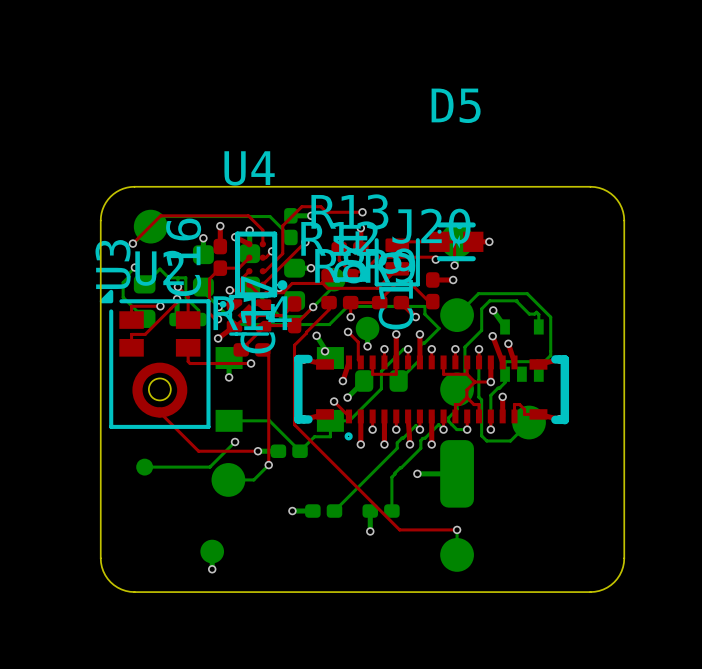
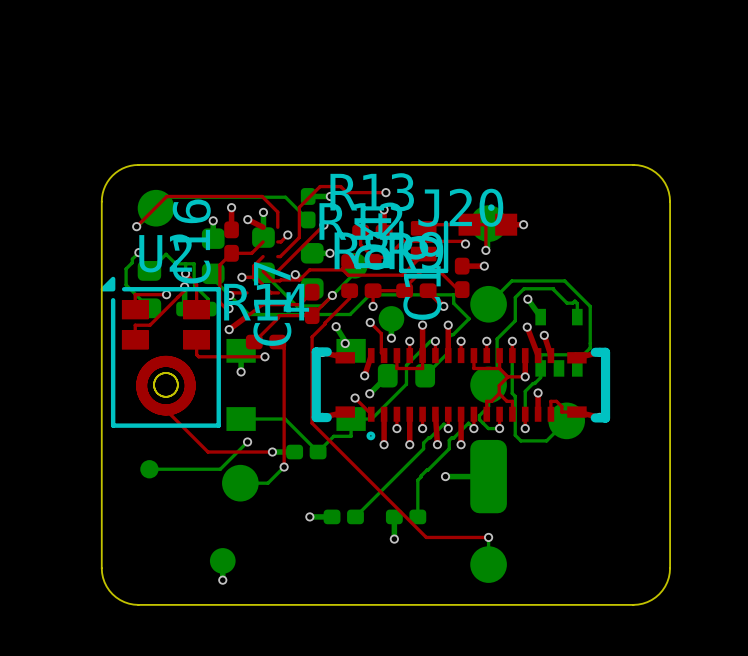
D5: (456, 241) -> none
part: none -> (487, 224)
U3: (261, 264) -> none
U4: (245, 315) -> none
part: none -> (165, 357)

